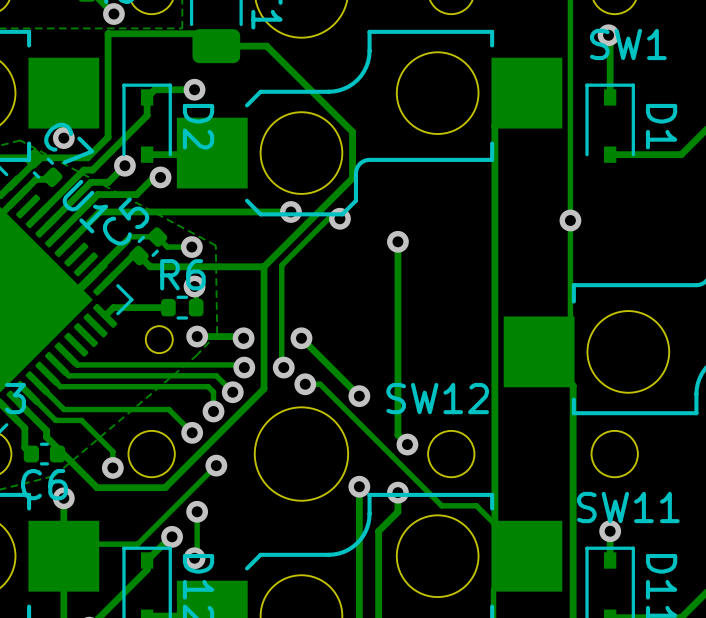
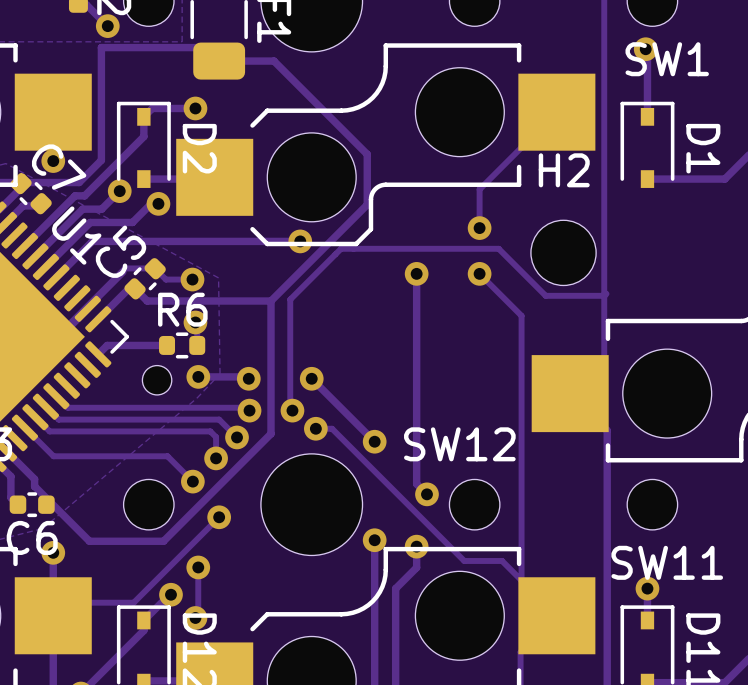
track: (494, 125) (494, 524) -> (479, 273) (521, 315) (521, 580)
track: none -> (522, 146) (479, 189) (479, 228)
via: none -> (479, 228)
track: none -> (353, 248) (498, 248) (545, 295) (604, 295) (606, 293)
via: (339, 218) -> none
via: (570, 220) -> none
H2: none -> (563, 252)
via: none -> (479, 273)
track: (28, 392) (55, 420) (81, 420) (112, 451) (112, 467) -> none
via: (112, 467) -> none

